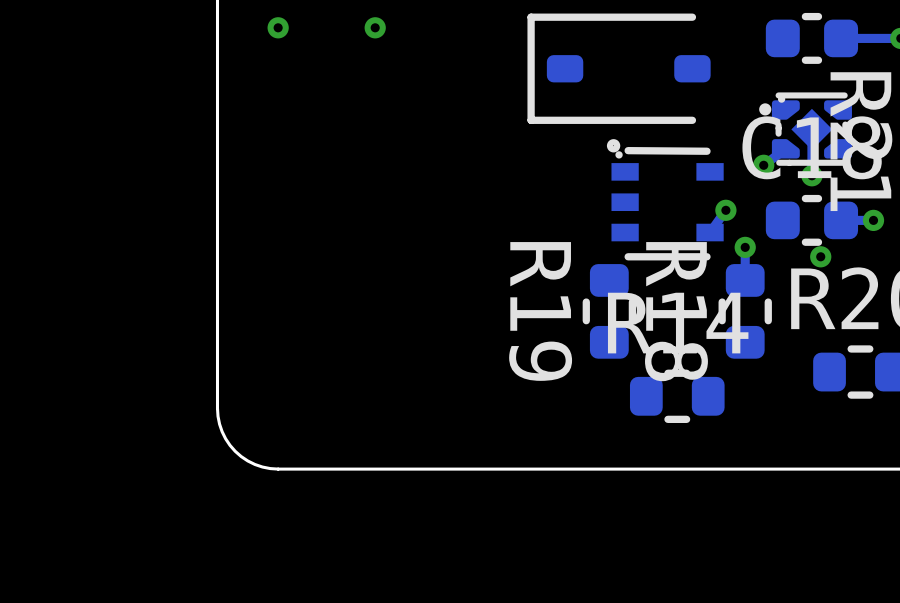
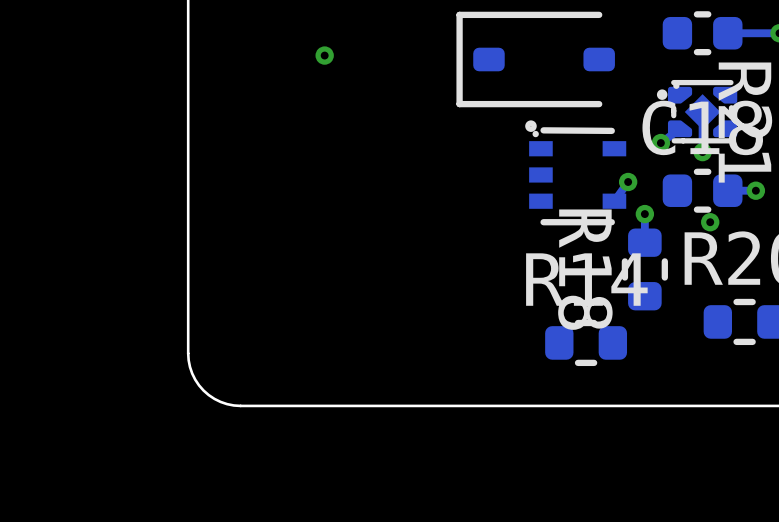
via: (278, 27) -> none
via position: (375, 27) -> (324, 55)
R19: (609, 311) -> none

